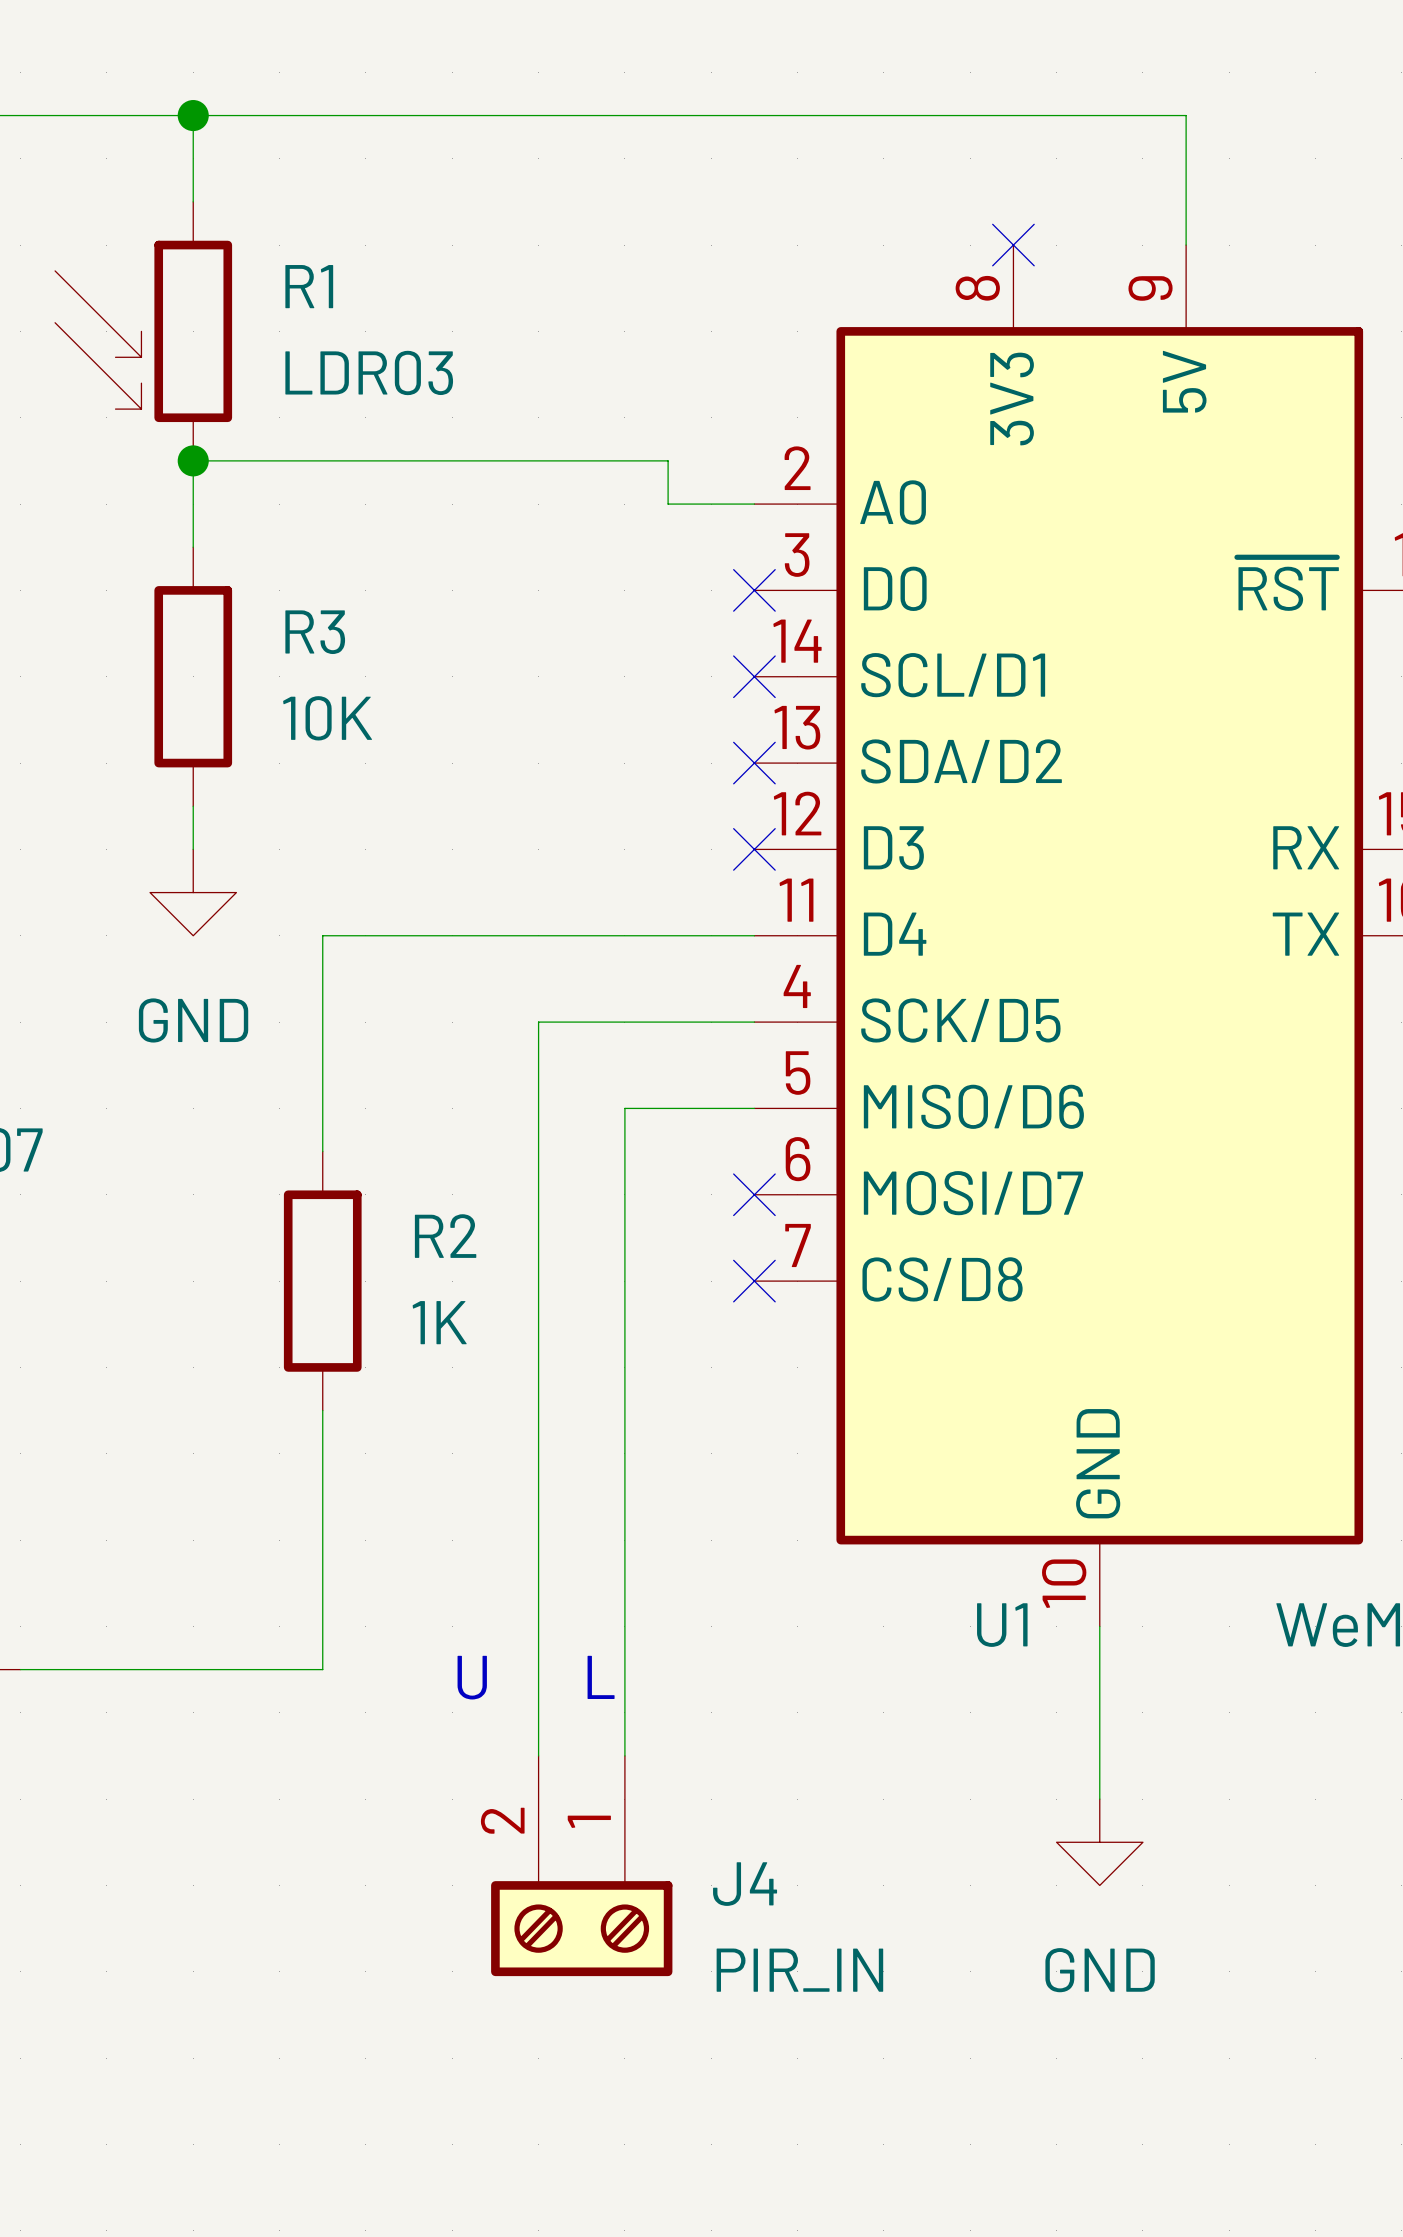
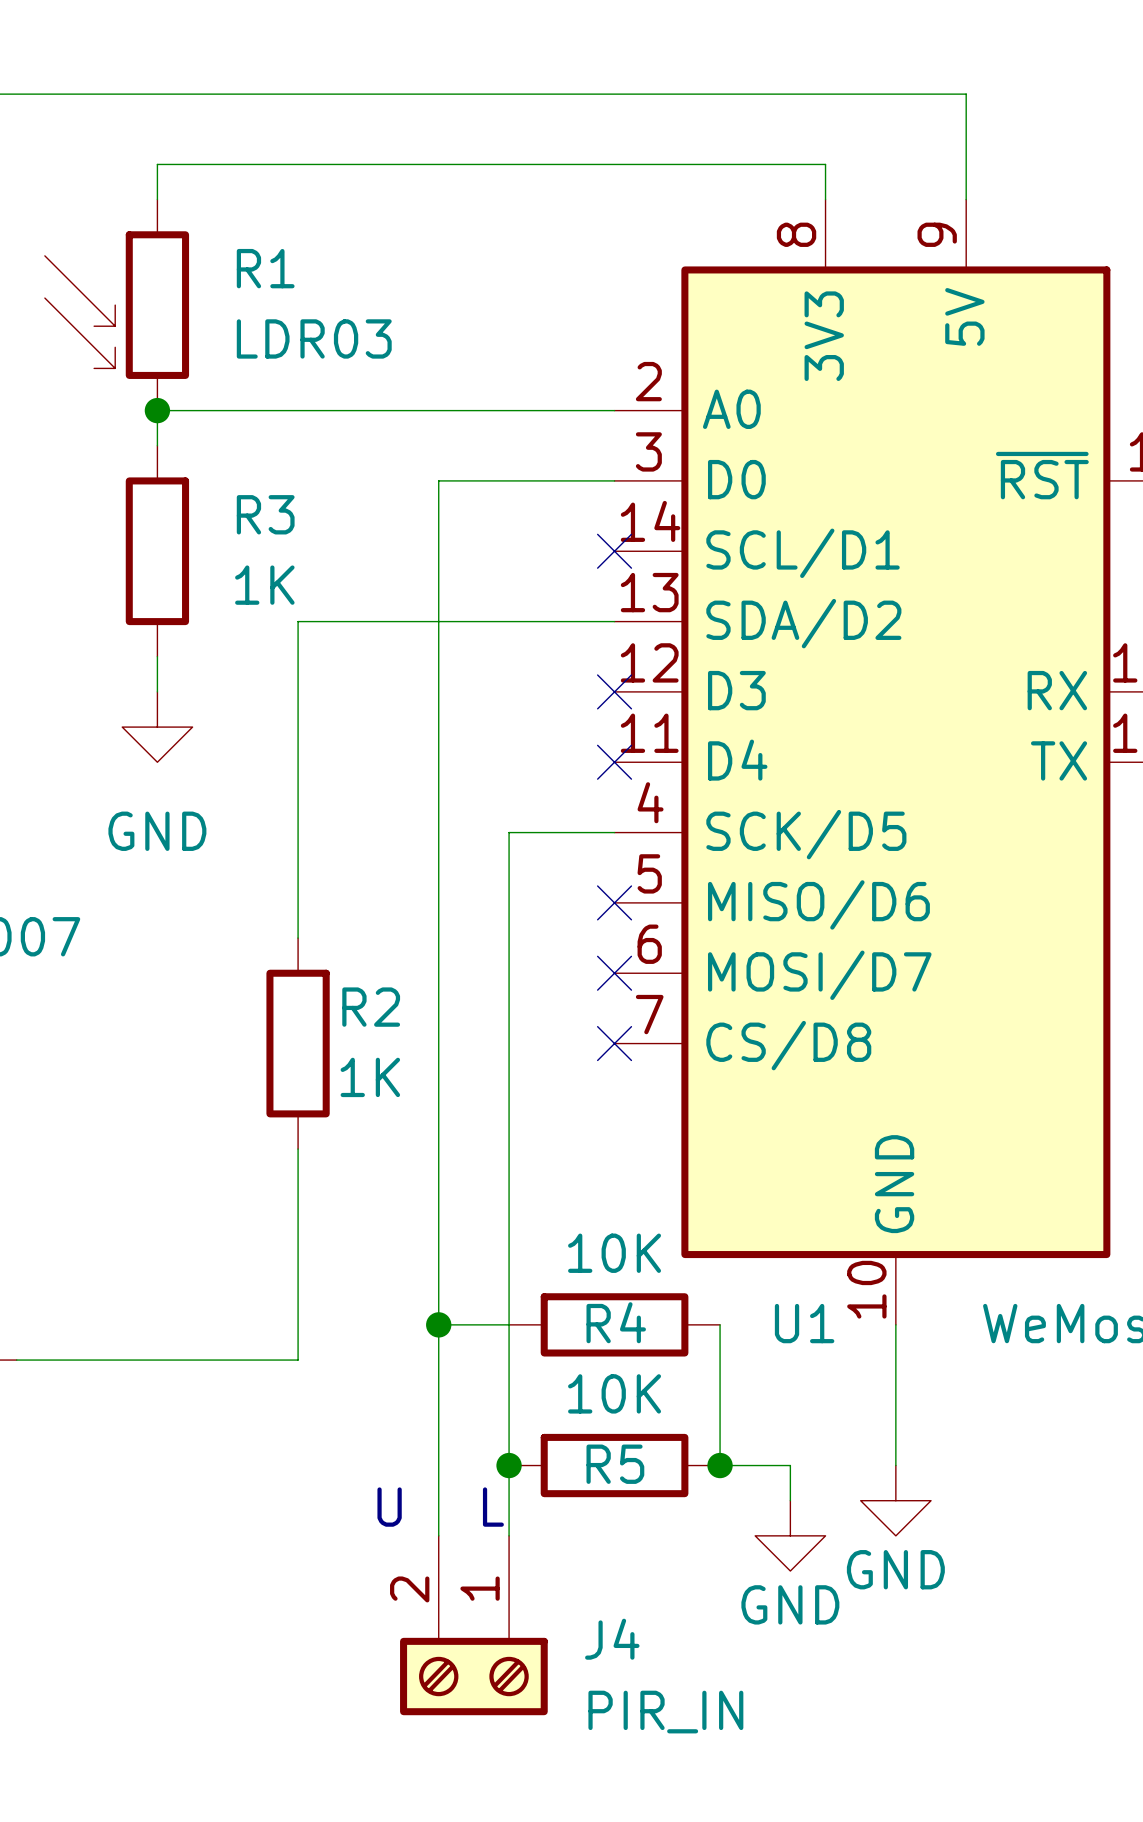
wire: (193, 115) (193, 201) -> none
junction: (193, 115) -> none
wire: none -> (157, 199) (157, 164) (825, 164) (825, 199)
no-connect mark: (1013, 245) -> none
R1 position: (143, 331) -> (116, 305)
junction position: (193, 460) -> (157, 410)
wire: (193, 504) (193, 460) (668, 460) (668, 504) -> (157, 410) (544, 410)
wire: none -> (614, 480) (438, 480) (438, 832)
no-connect mark: (754, 590) -> none
R3 value: 10K (327, 718) -> 1K (264, 585)
wire: none -> (614, 621) (298, 621) (298, 938)
no-connect mark: (754, 763) -> none
wire: (754, 935) (322, 935) (322, 1151) -> none
no-connect mark: none -> (614, 762)
wire: (538, 1022) (624, 1022) -> (509, 902) (509, 832)
wire: (624, 1108) (754, 1108) -> none
no-connect mark: none -> (614, 902)
R2 position: (322, 1281) -> (298, 1043)
wire: (322, 1410) (322, 1669) -> (298, 1149) (298, 1360) (262, 1360)
wire: none -> (438, 1324) (509, 1324)
junction: none -> (438, 1324)
R4: none -> 10K (614, 1324)
wire: none -> (720, 1324) (720, 1465) (790, 1465) (790, 1500)
text position: U (472, 1677) -> U (389, 1507)
text position: L (601, 1677) -> L (493, 1507)
junction: none -> (509, 1465)
R5: none -> 10K (614, 1465)
junction: none -> (720, 1465)
J4 position: (581, 1866) -> (473, 1625)
power symbol: none -> GND (790, 1535)
power symbol text position: GND (1100, 1970) -> GND (895, 1569)

